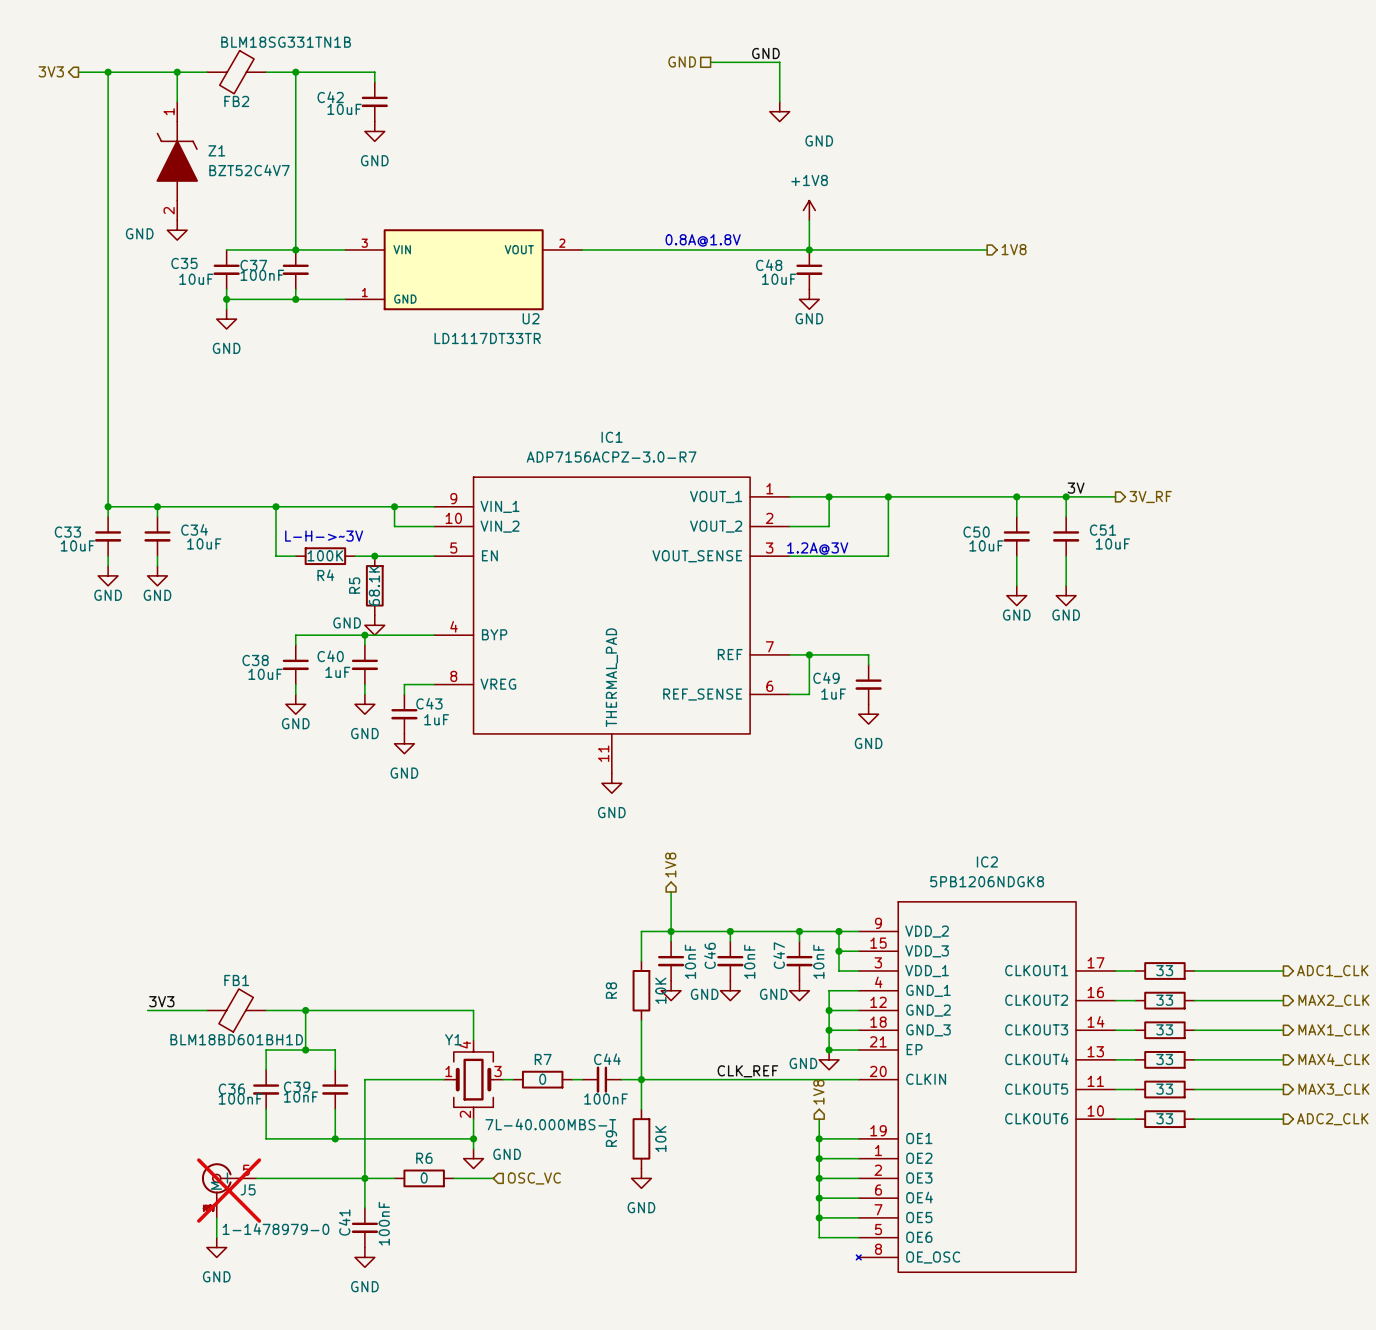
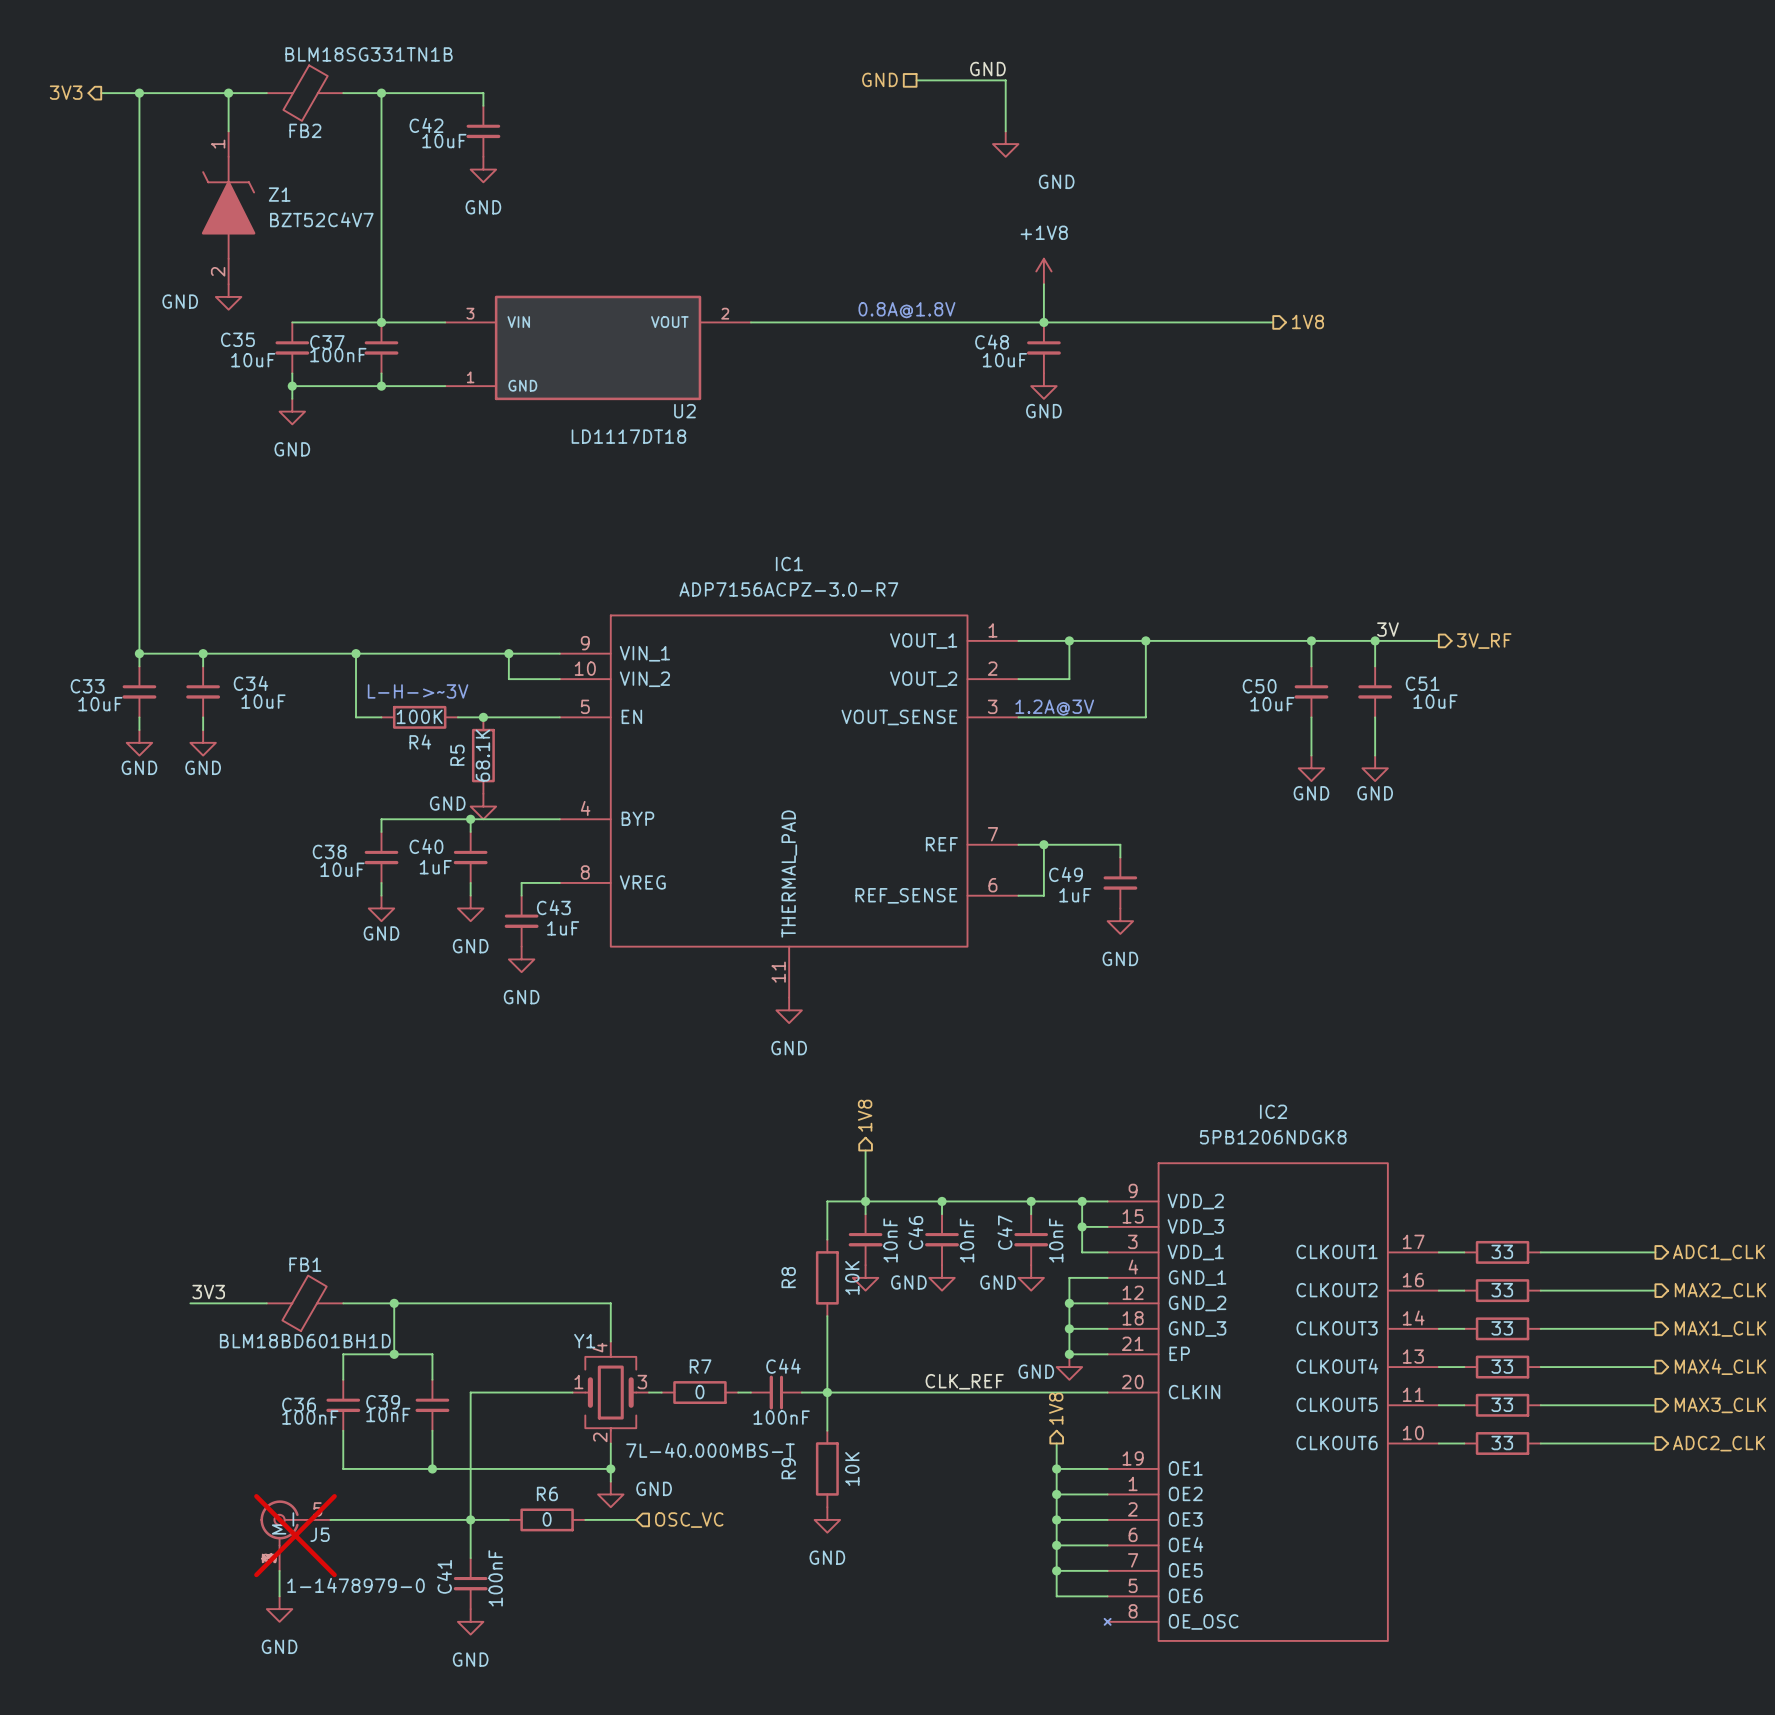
U2 value: LD1117DT33TR (487, 338) -> LD1117DT18 (628, 436)

